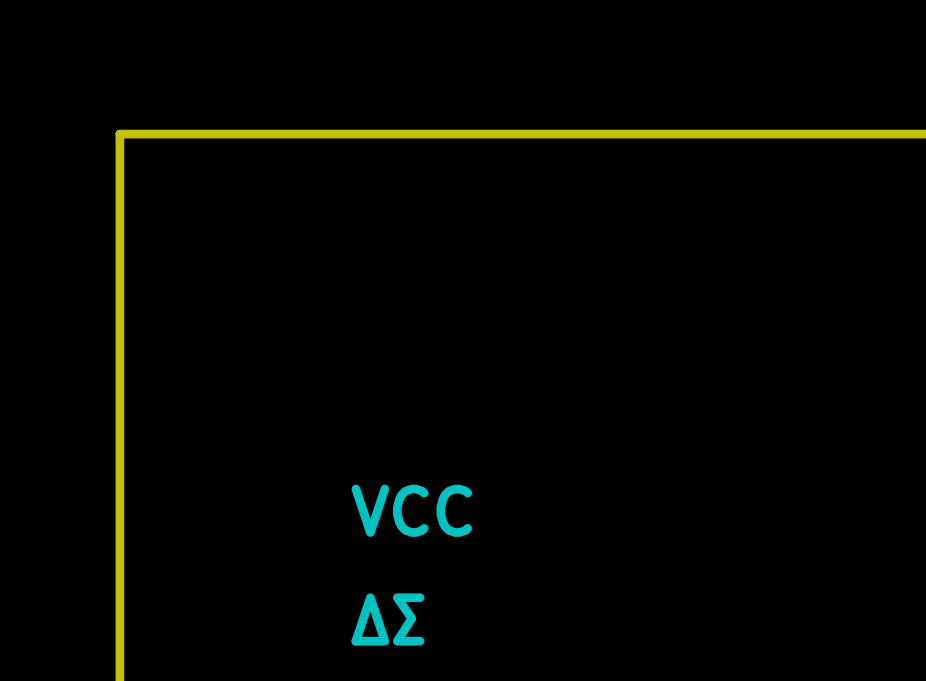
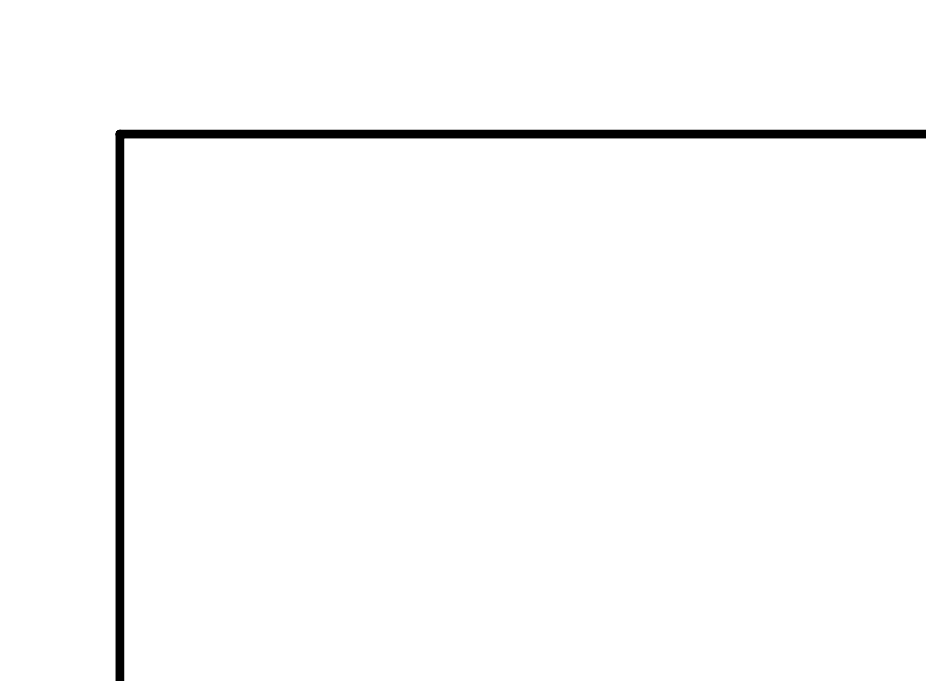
text: VCC (411, 510) -> none
text: ΔΣ (387, 619) -> none

